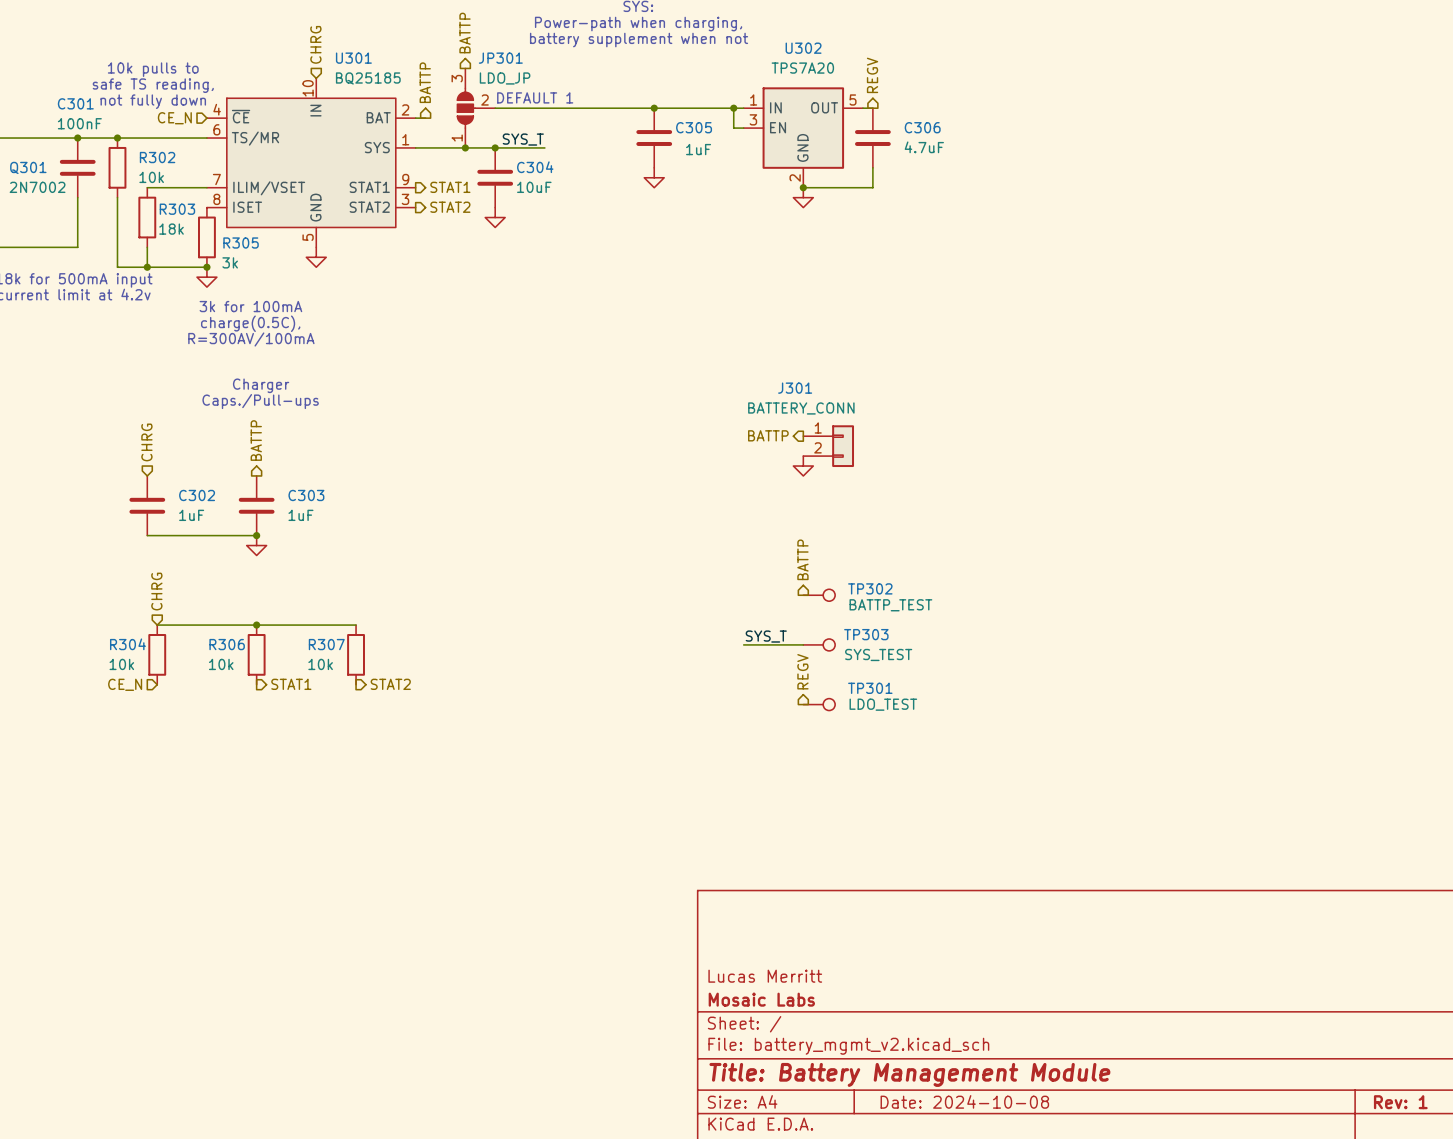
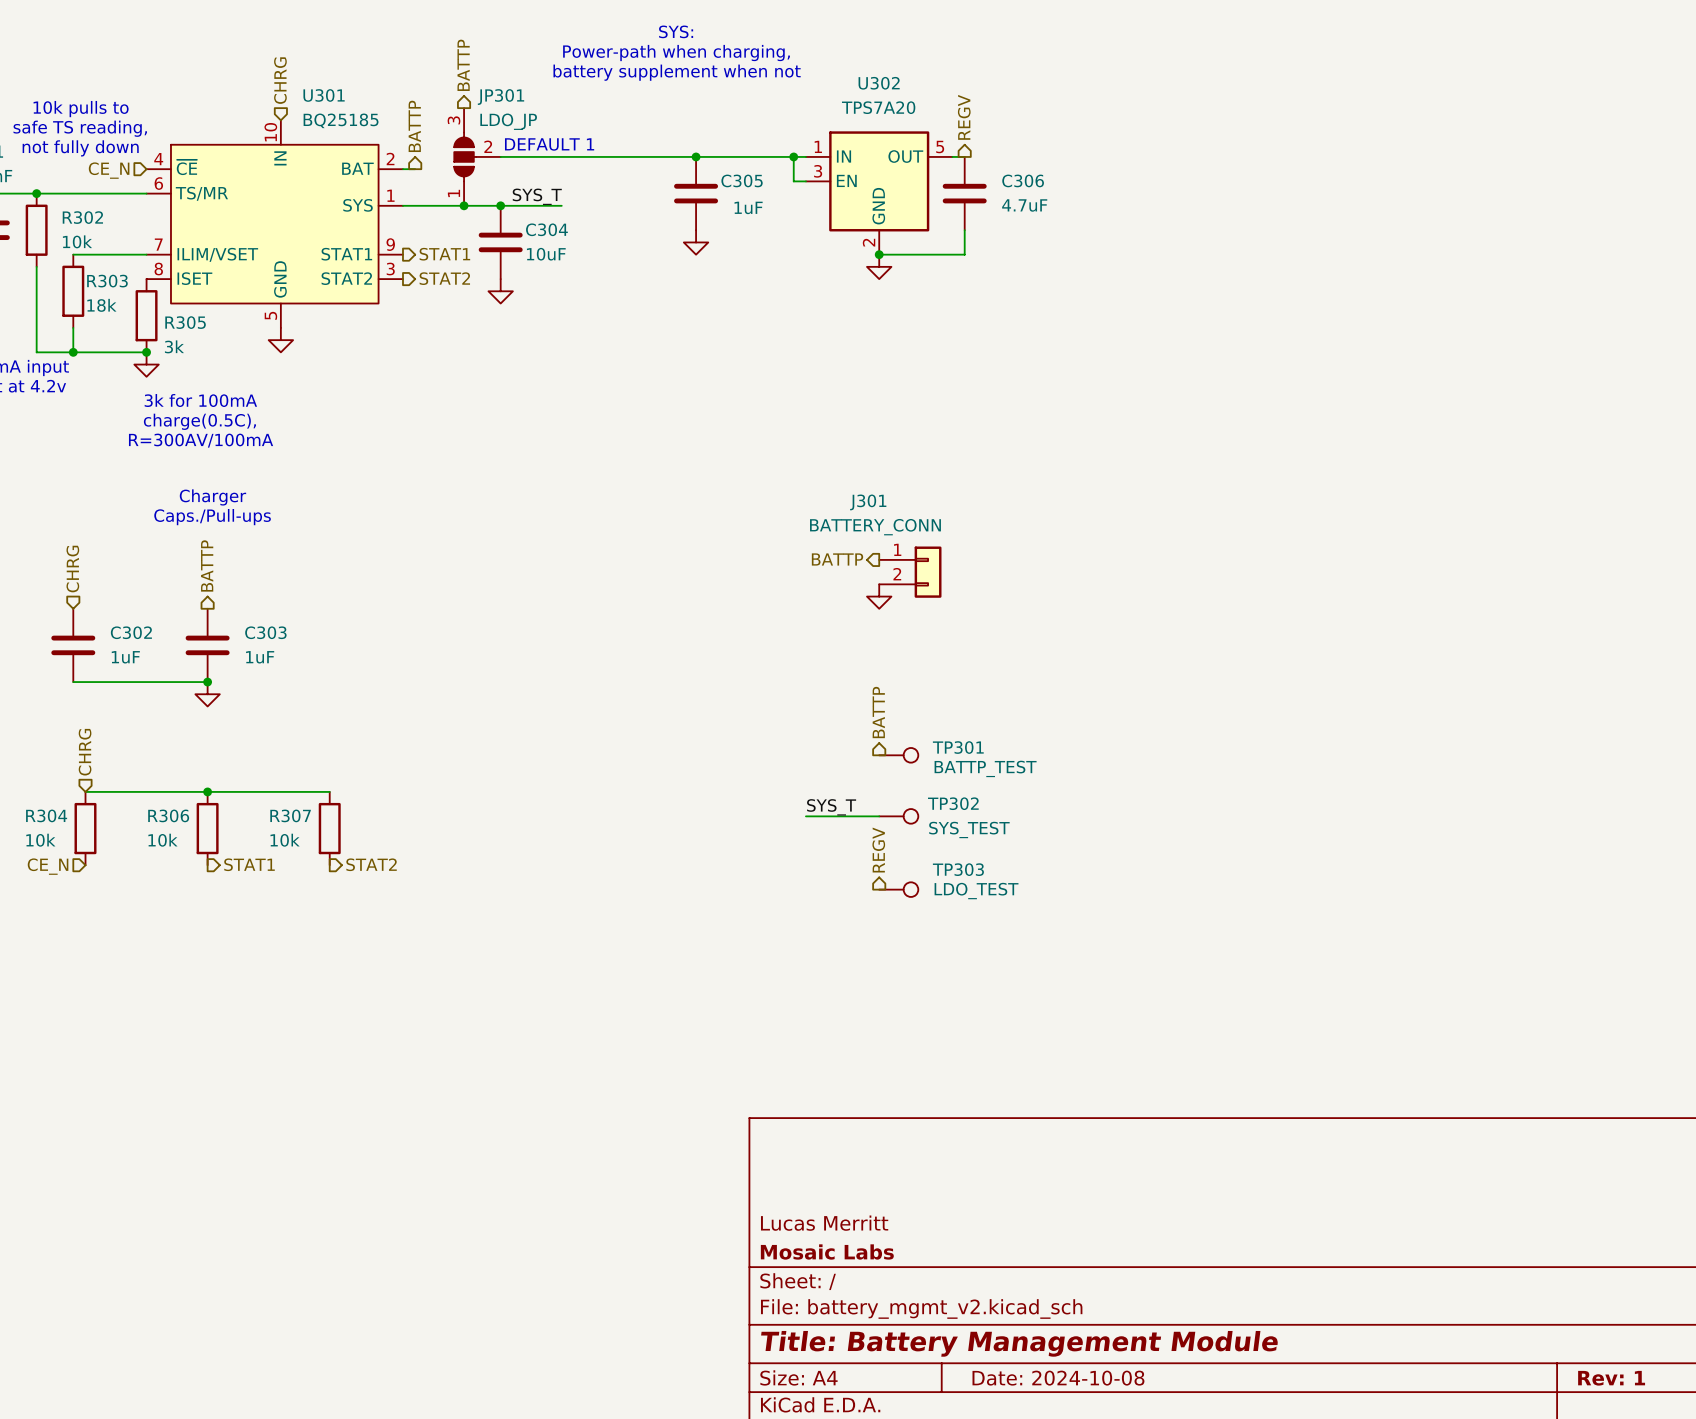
TP302 name: TP302 (870, 588) -> TP301 (958, 747)
TP303 name: TP303 (866, 634) -> TP302 (953, 803)
TP301 name: TP301 (870, 688) -> TP303 (958, 869)

